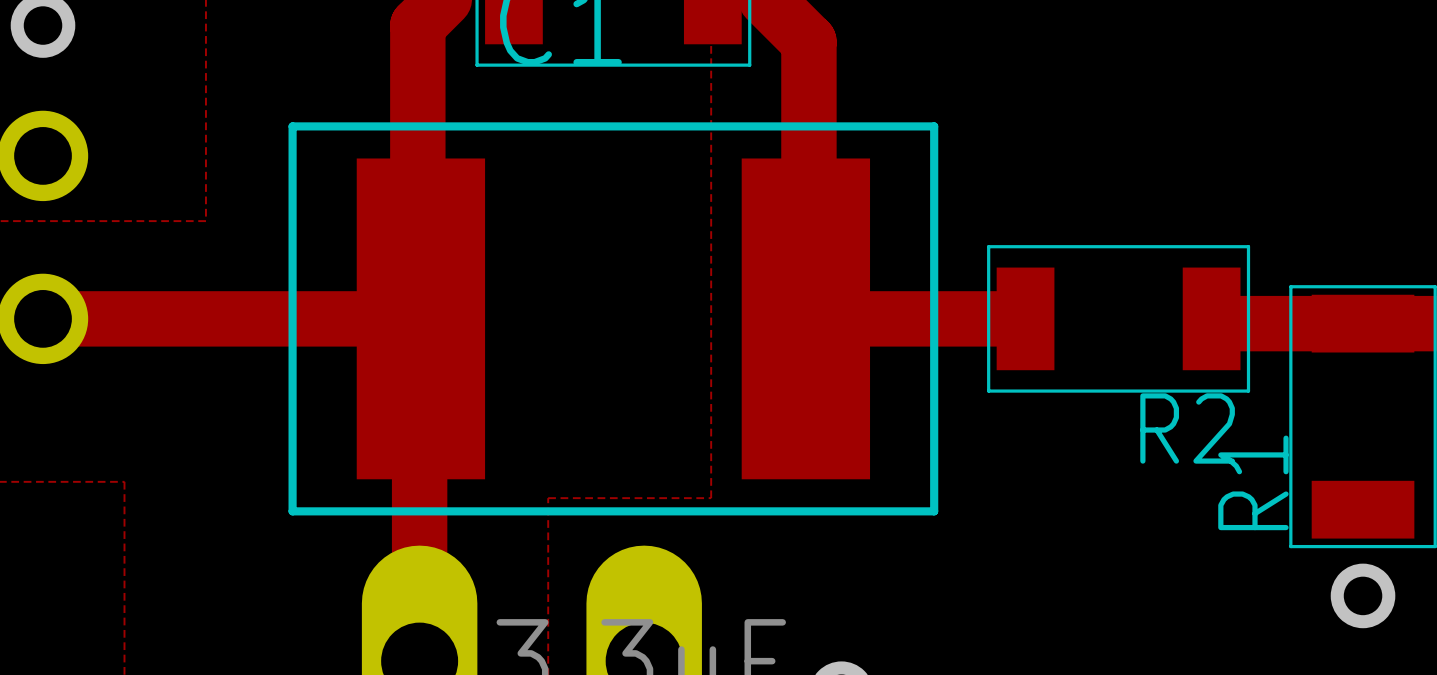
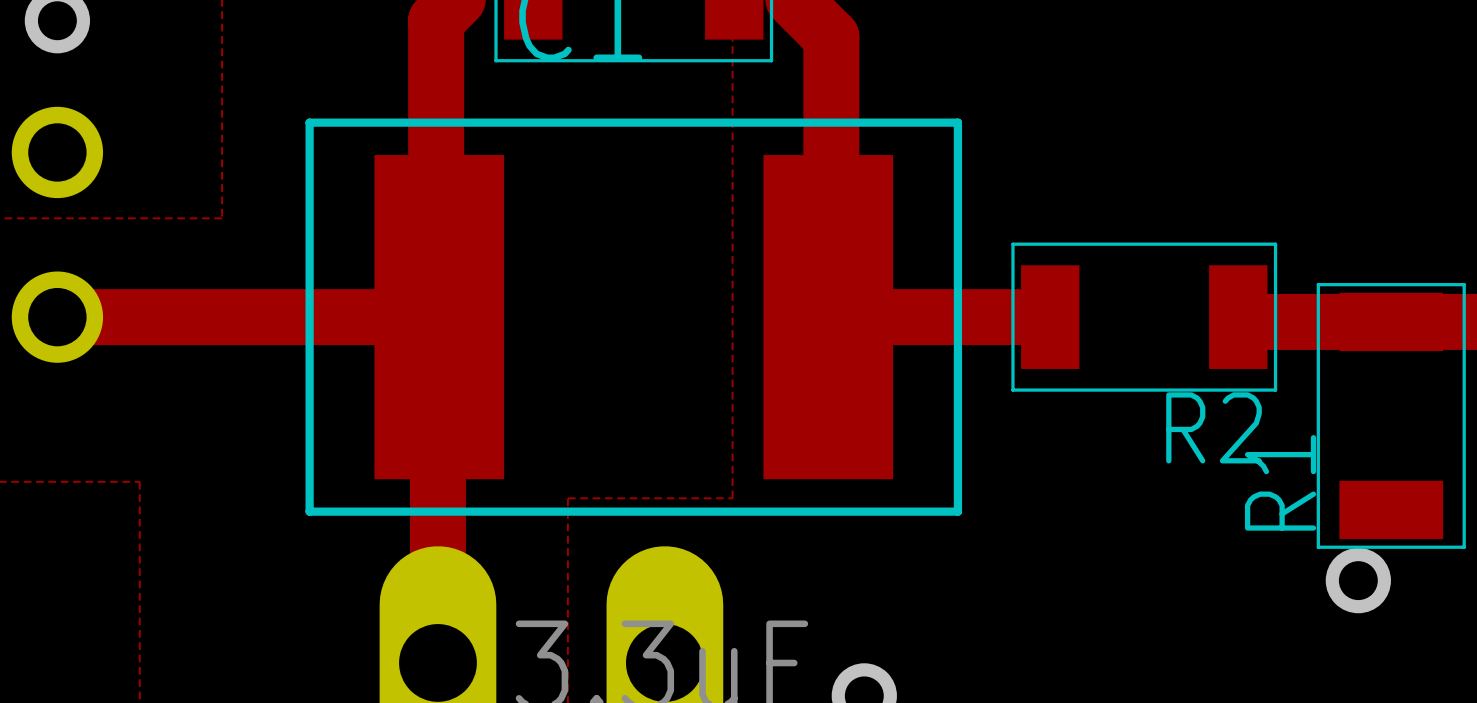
via position: (1363, 595) -> (1358, 580)

